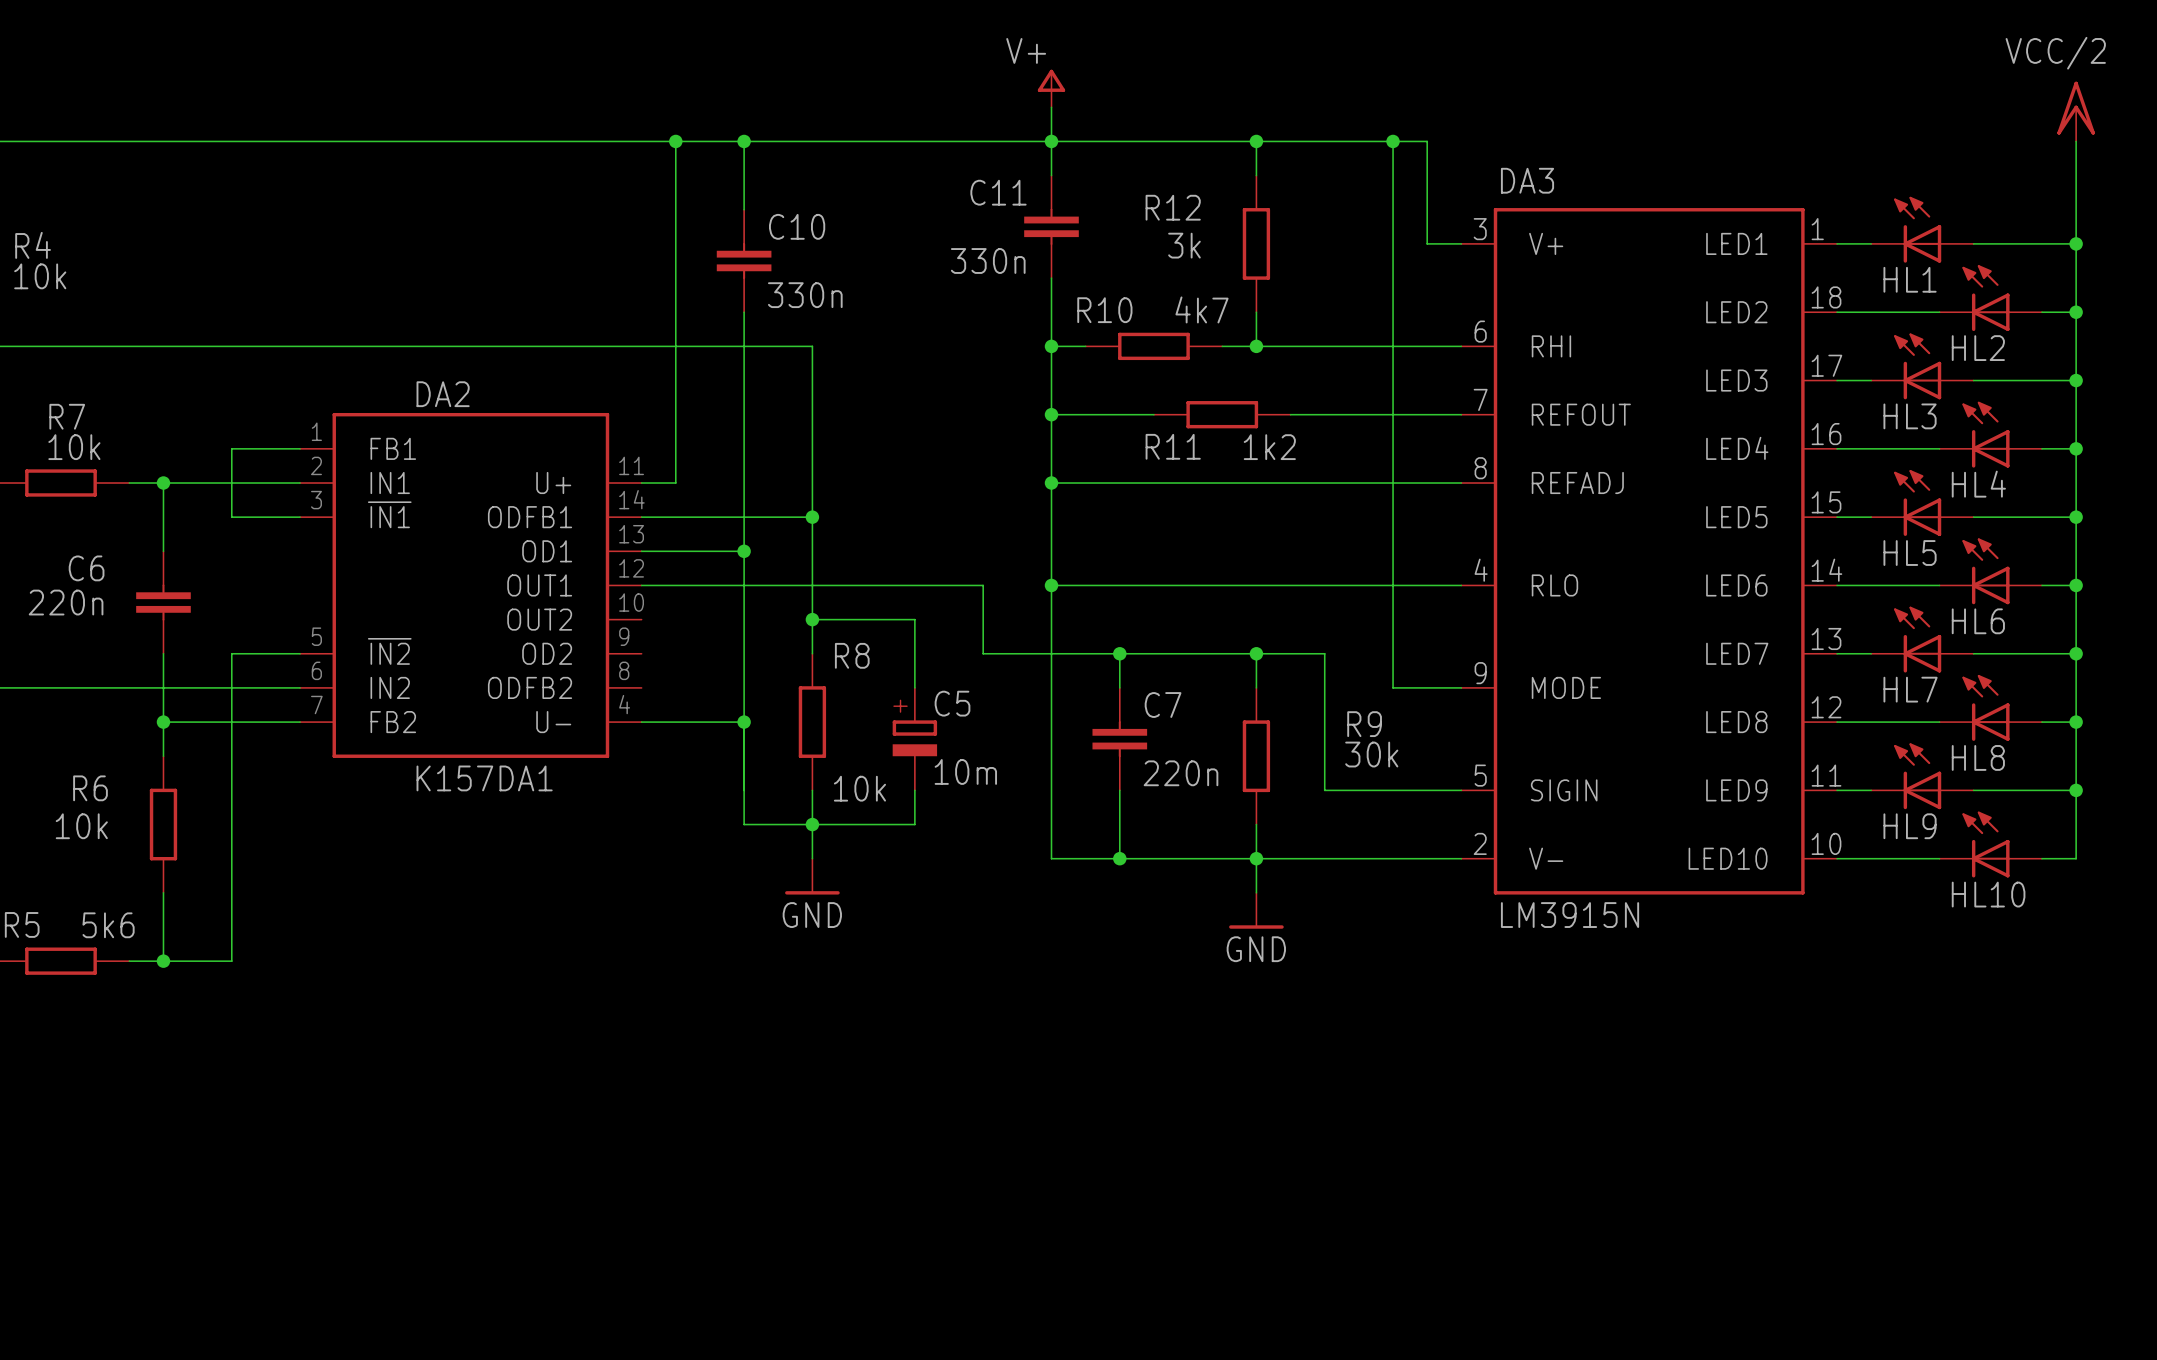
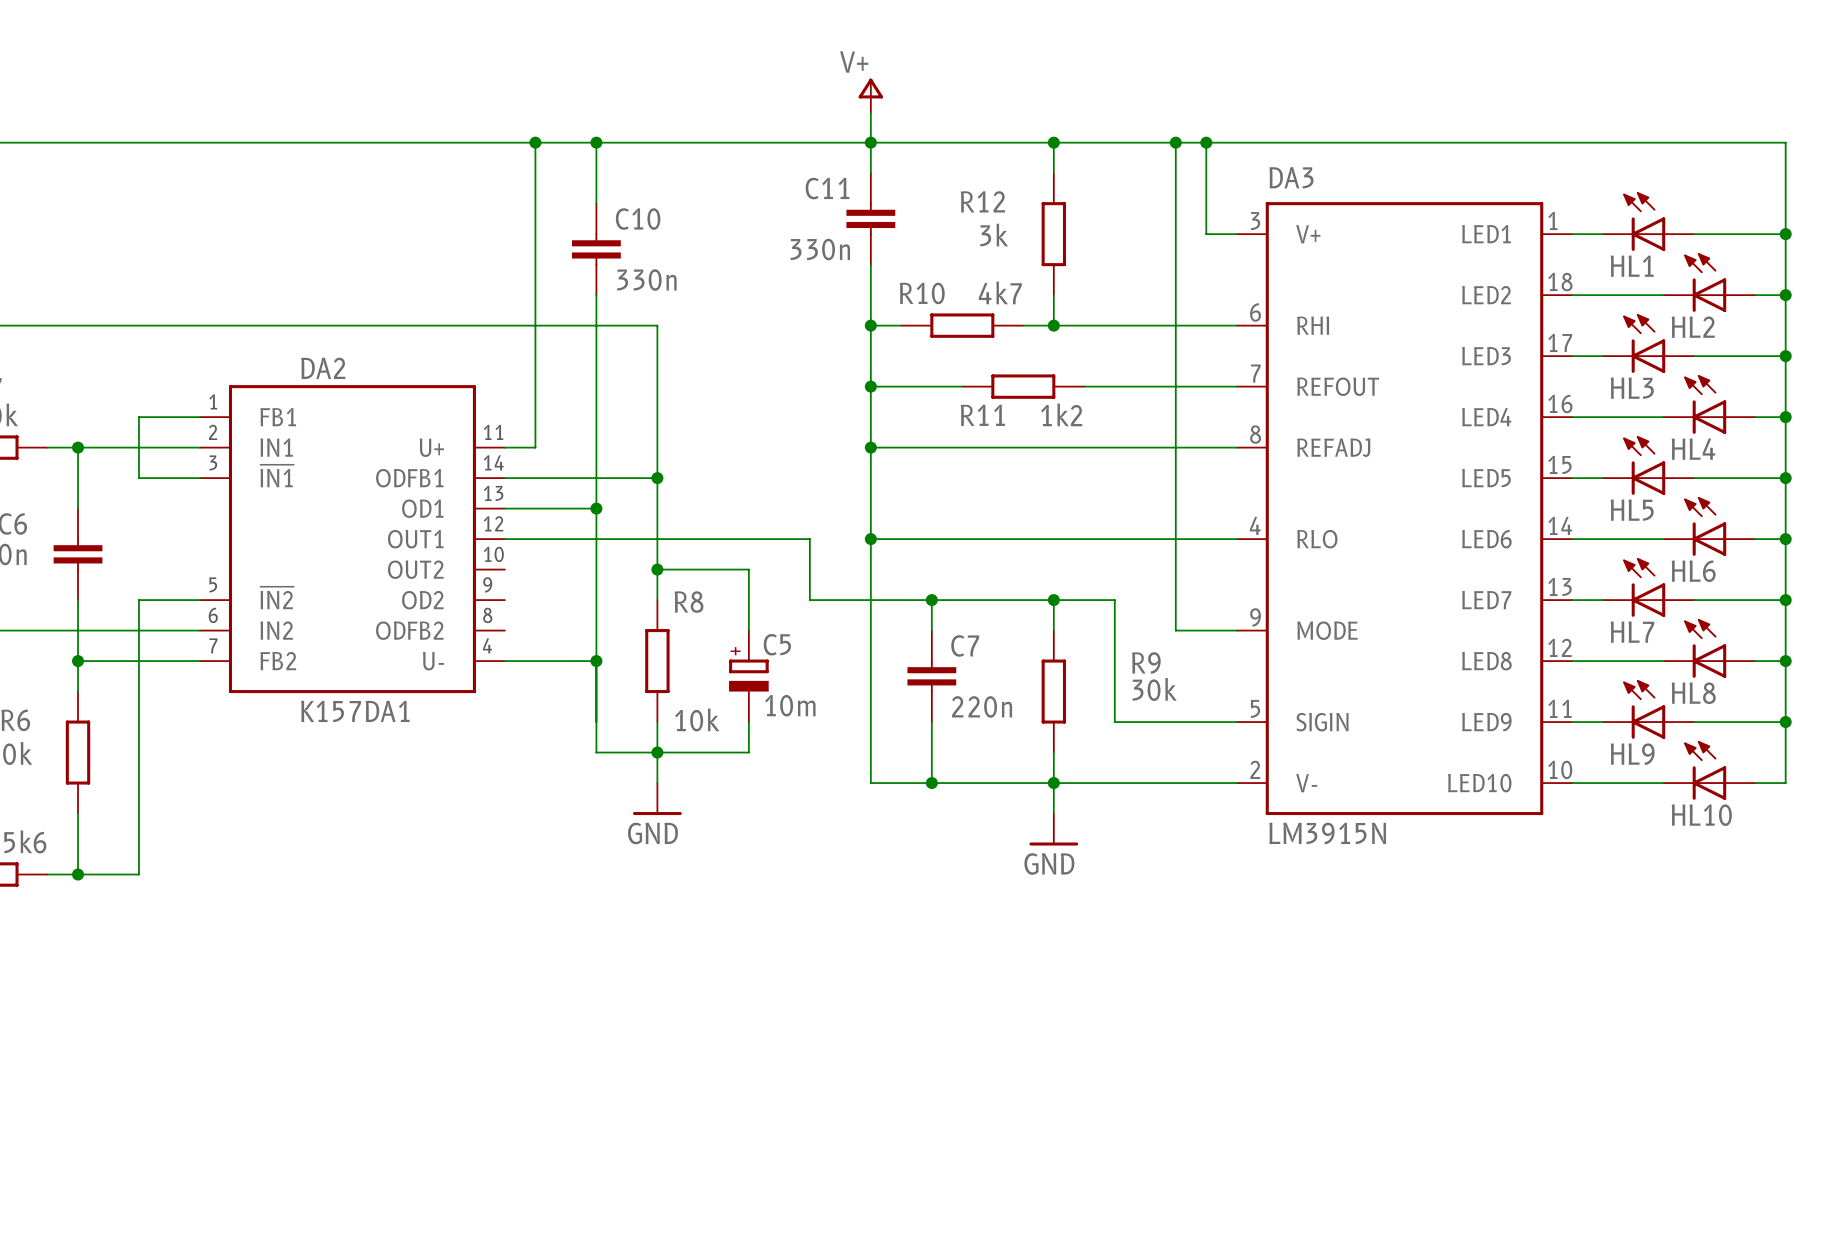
power symbol: VCC/2 (2076, 111) -> none
wire: none -> (1206, 142) (1785, 142)
junction: none -> (1206, 142)

